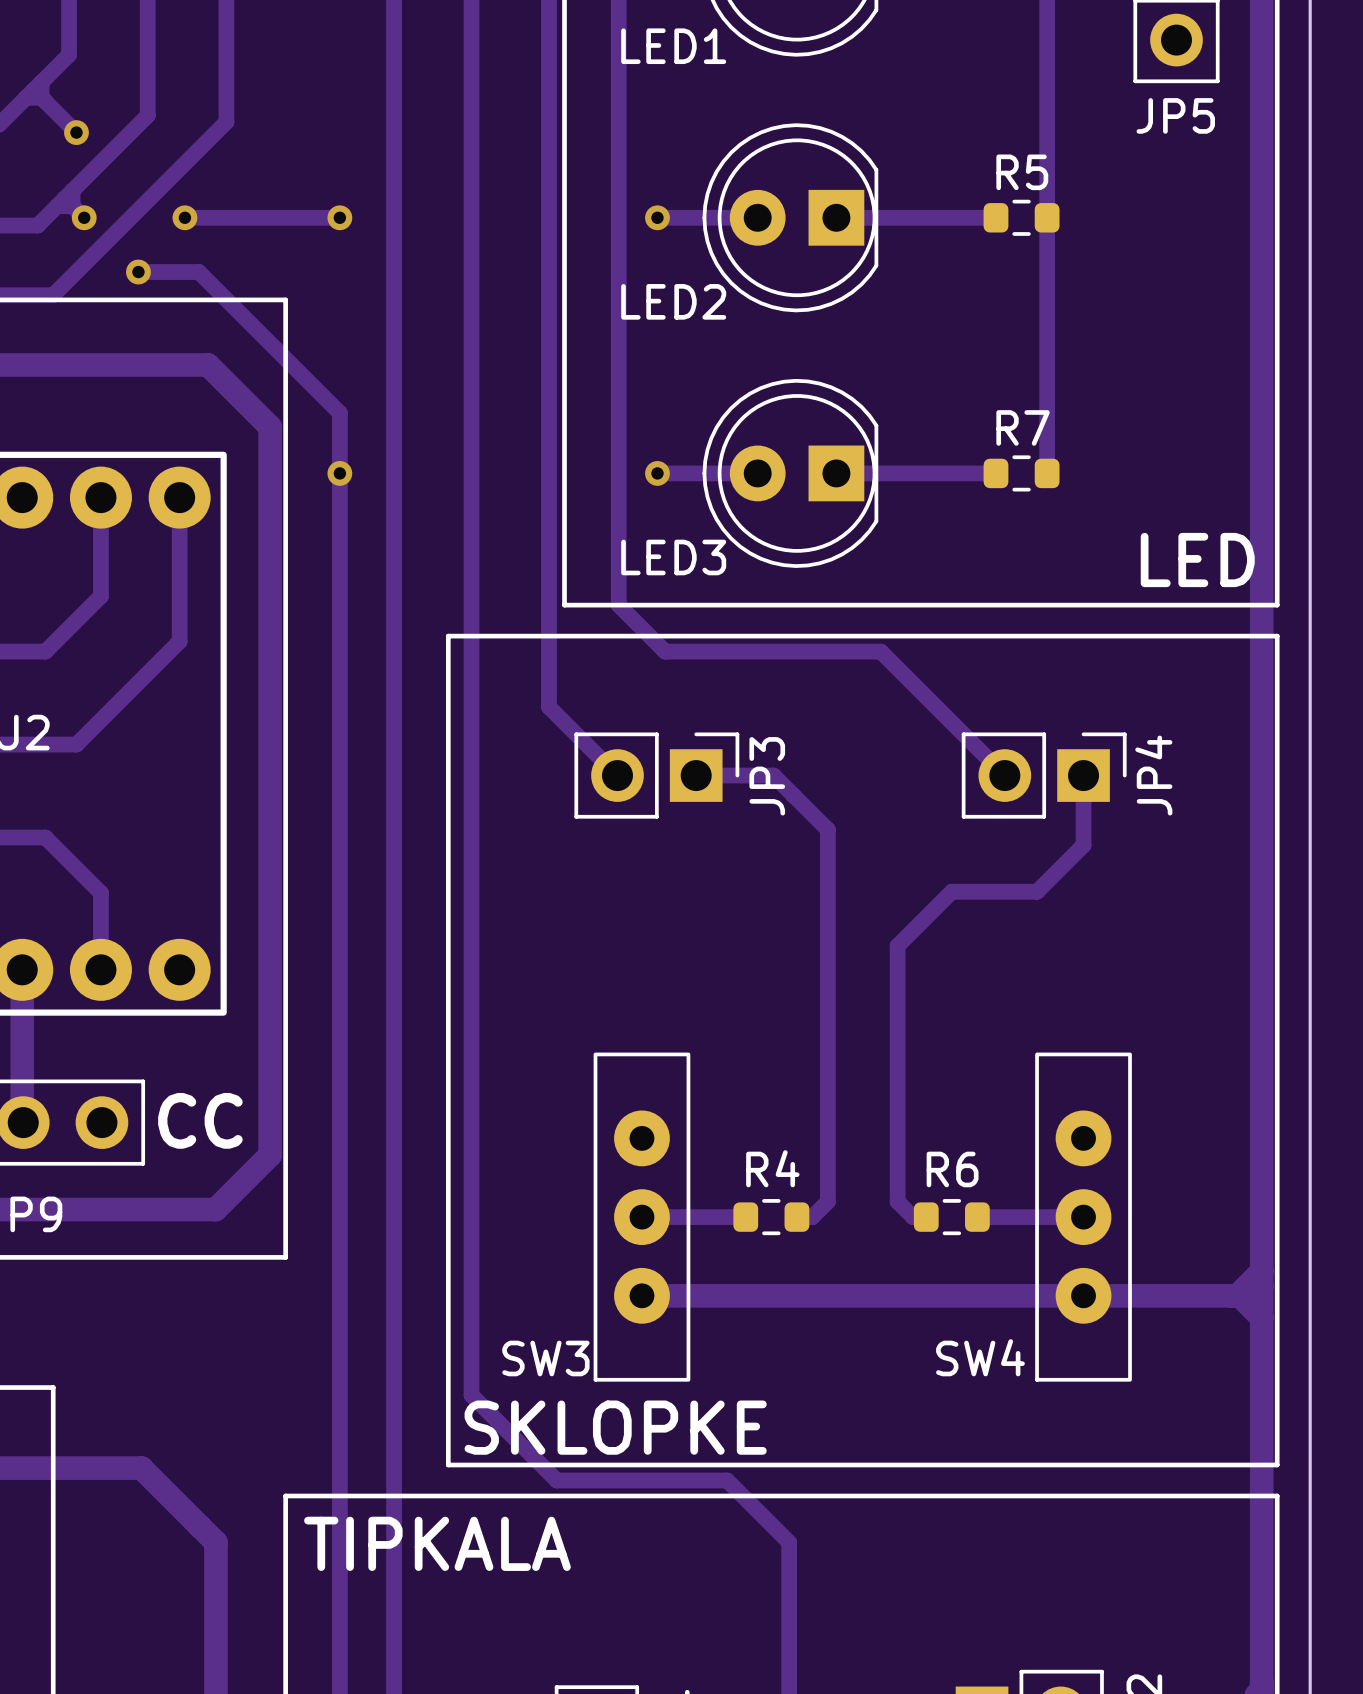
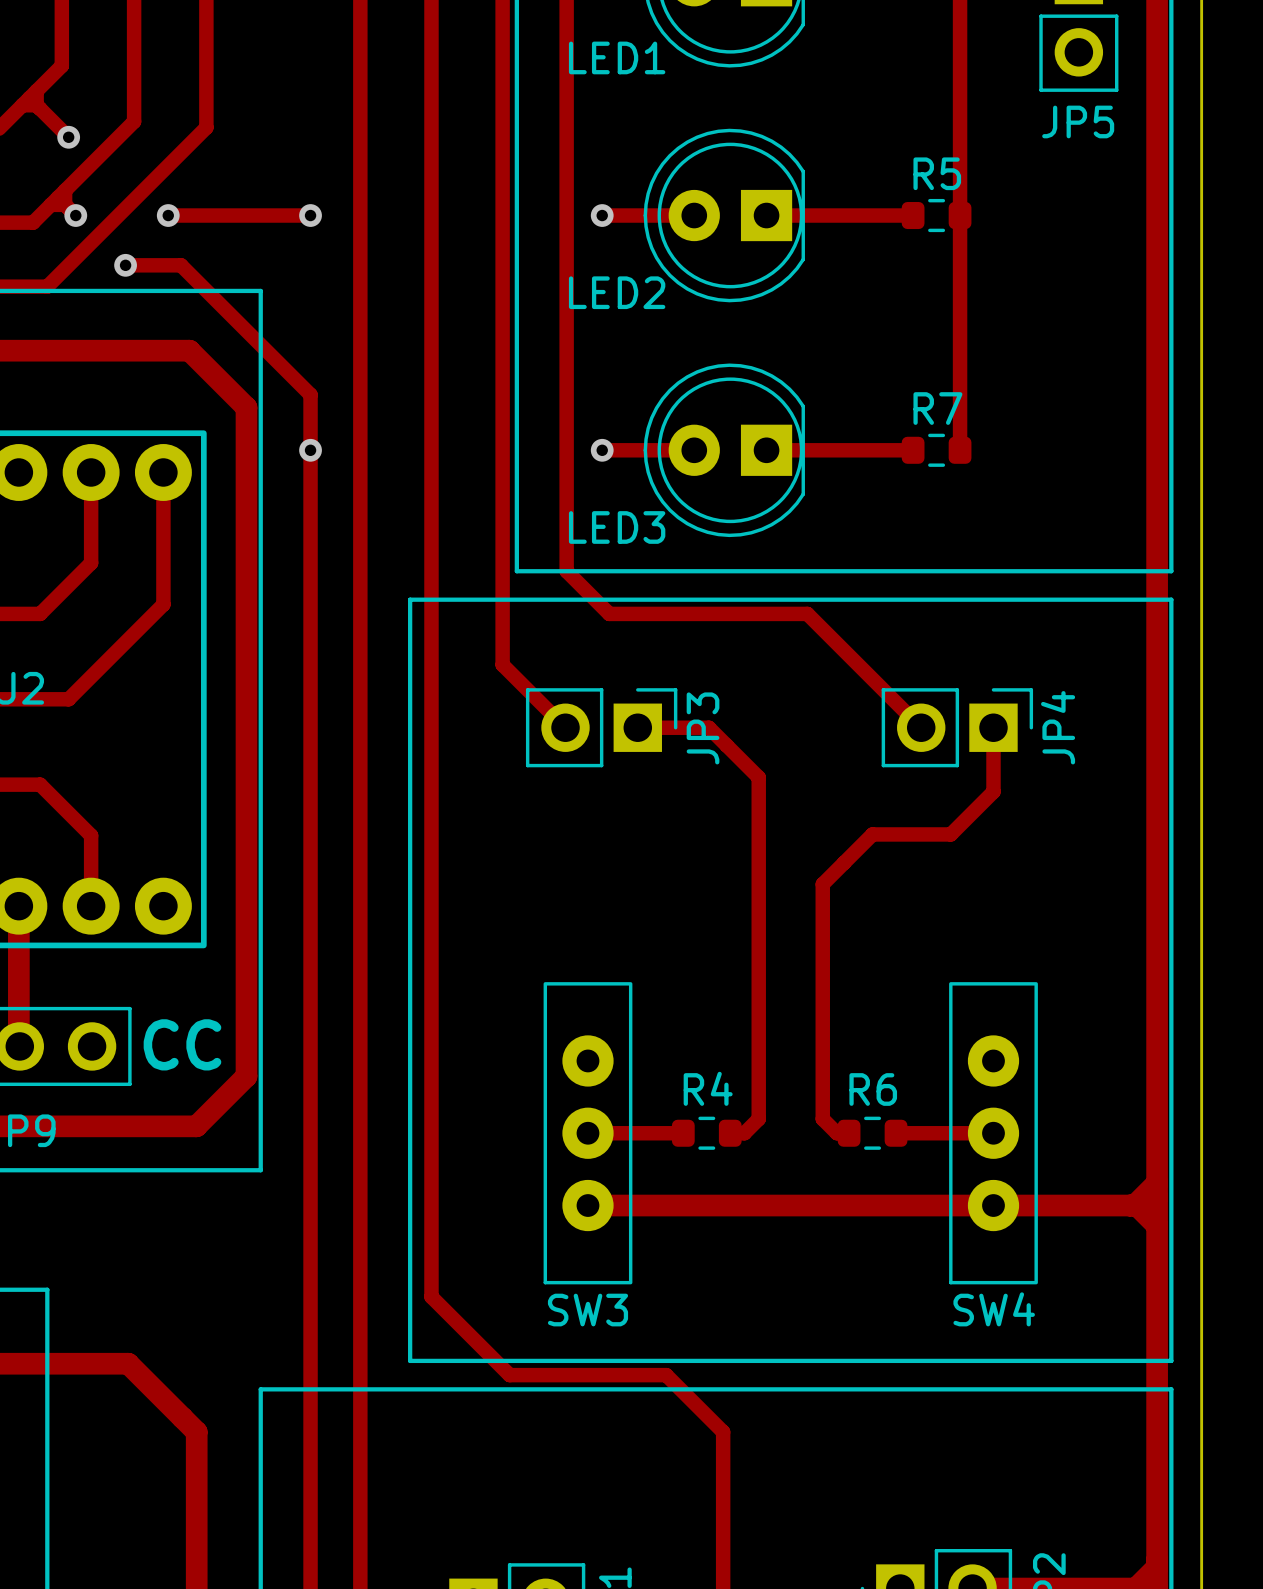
text: LED (1197, 560) -> none
SW4 name position: SW4 (980, 1357) -> SW4 (994, 1309)
SW3 name position: SW3 (545, 1358) -> SW3 (587, 1310)
text: SKLOPKE (615, 1427) -> none
text: TIPKALA (437, 1543) -> none

